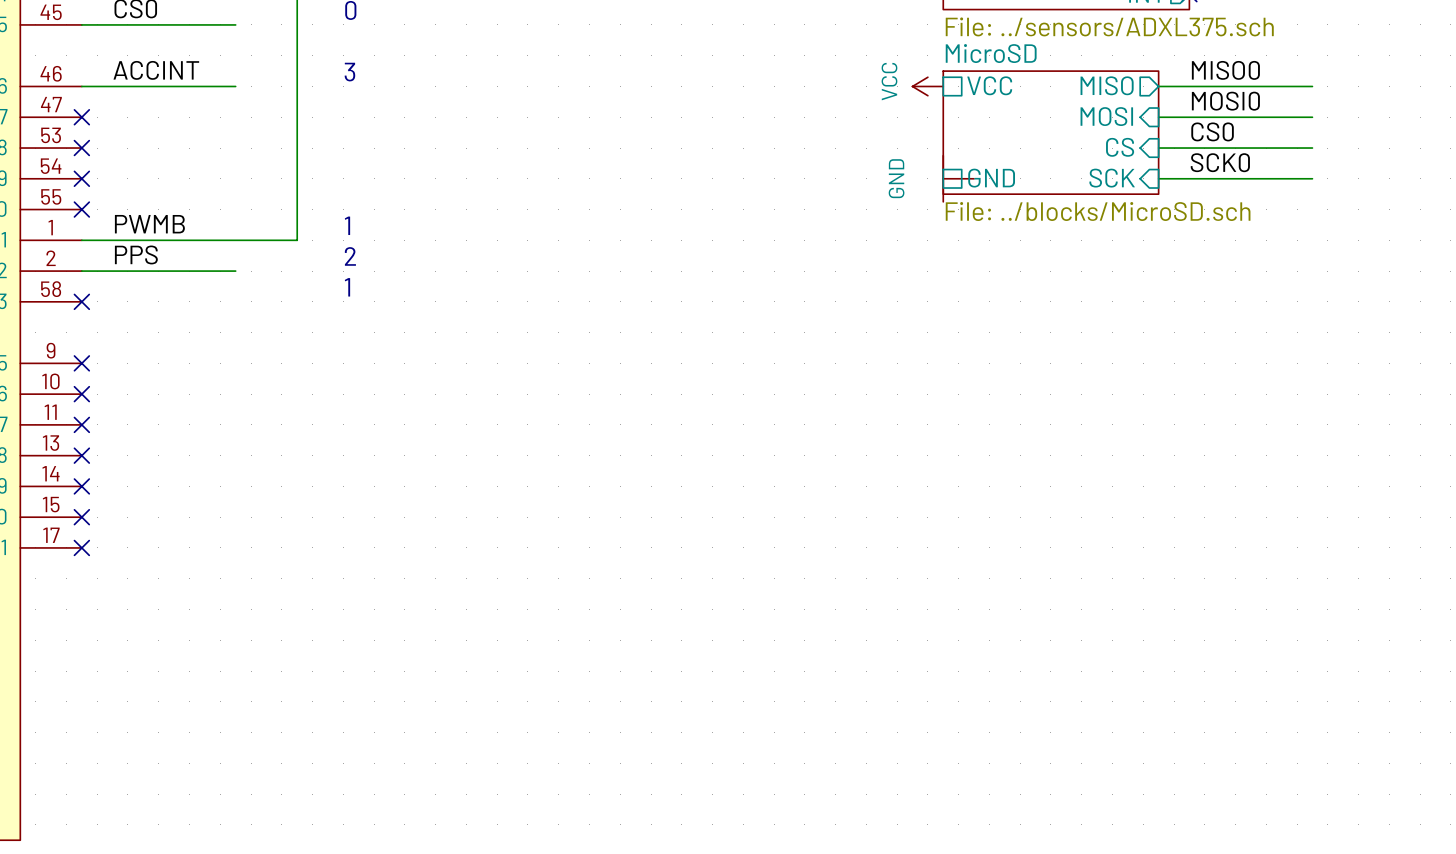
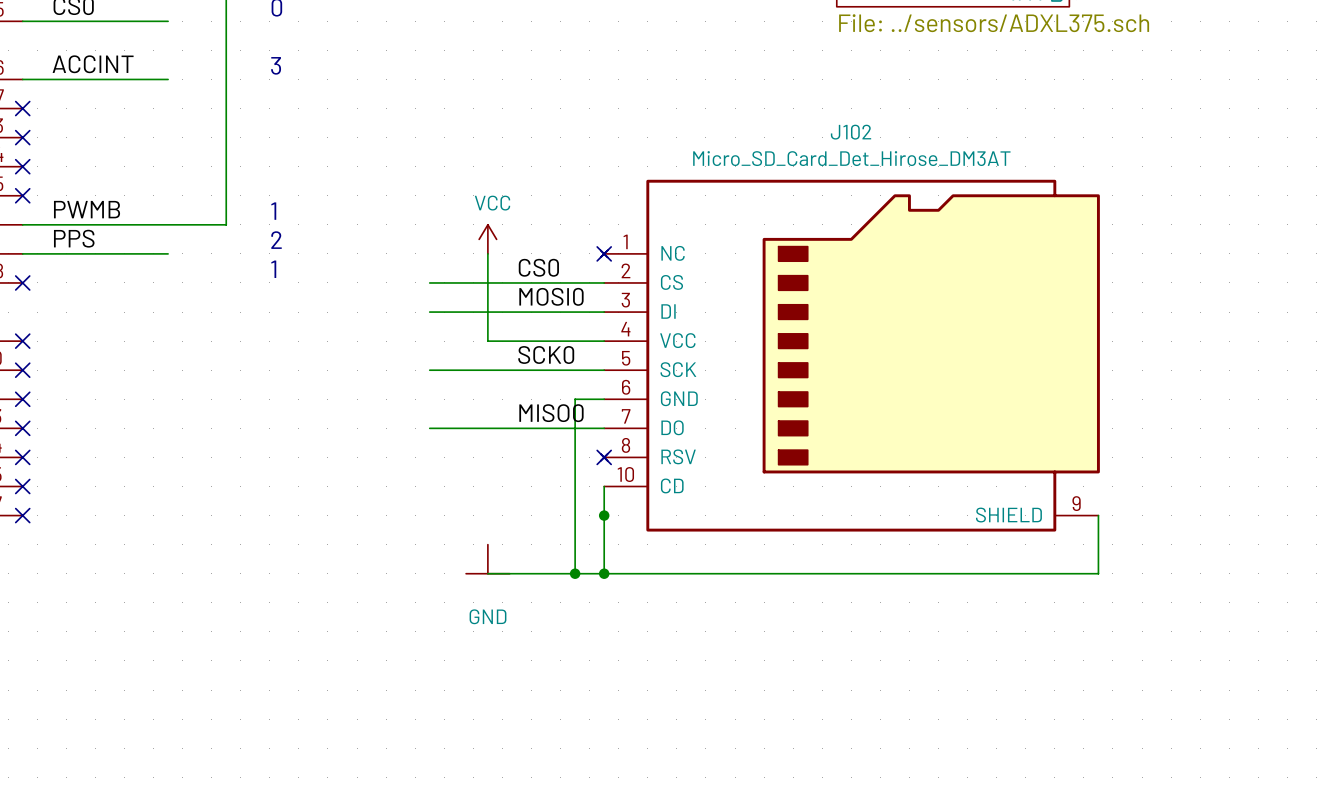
label: MISO0 (1225, 70) -> none
sheet pin: VCC (989, 85) -> none
sheet pin: MISO (1107, 85) -> none
power symbol: VCC (927, 86) -> none
wire: (1158, 86) (1312, 86) -> none
label: MOSI0 (1225, 101) -> none
sheet pin: MOSI (1106, 116) -> none
wire: (1158, 117) (1312, 117) -> none
label: CS0 (1212, 131) -> none
sheet MicroSD: File: ../blocks/MicroSD.sch (1050, 132) -> none
sheet pin: CS (1120, 147) -> none
wire: (1158, 148) (1312, 148) -> none
label: SCK0 (1220, 162) -> none
power symbol: GND (958, 178) -> none
sheet pin: GND (991, 178) -> none
sheet pin: SCK (1112, 178) -> none
wire: (1158, 178) (1312, 178) -> none
power symbol: none -> VCC (487, 239)
wire: none -> (487, 253) (487, 341) (604, 341)
no-connect mark: none -> (604, 253)
label: none -> CS0 (538, 267)
wire: none -> (429, 282) (604, 282)
label: none -> MOSI0 (551, 296)
wire: none -> (429, 312) (604, 312)
label: none -> SCK0 (546, 355)
J102: none -> Micro_SD_Card_Det_Hirose_DM3AT (850, 355)
wire: none -> (429, 370) (604, 370)
wire: none -> (604, 399) (575, 399) (575, 573)
label: none -> MISO0 (551, 413)
wire: none -> (429, 428) (604, 428)
no-connect mark: none -> (604, 457)
wire: none -> (604, 486) (604, 573)
junction: none -> (604, 515)
wire: none -> (1098, 515) (1098, 573) (487, 573)
power symbol: none -> GND (487, 559)
junction: none -> (575, 573)
junction: none -> (604, 573)

